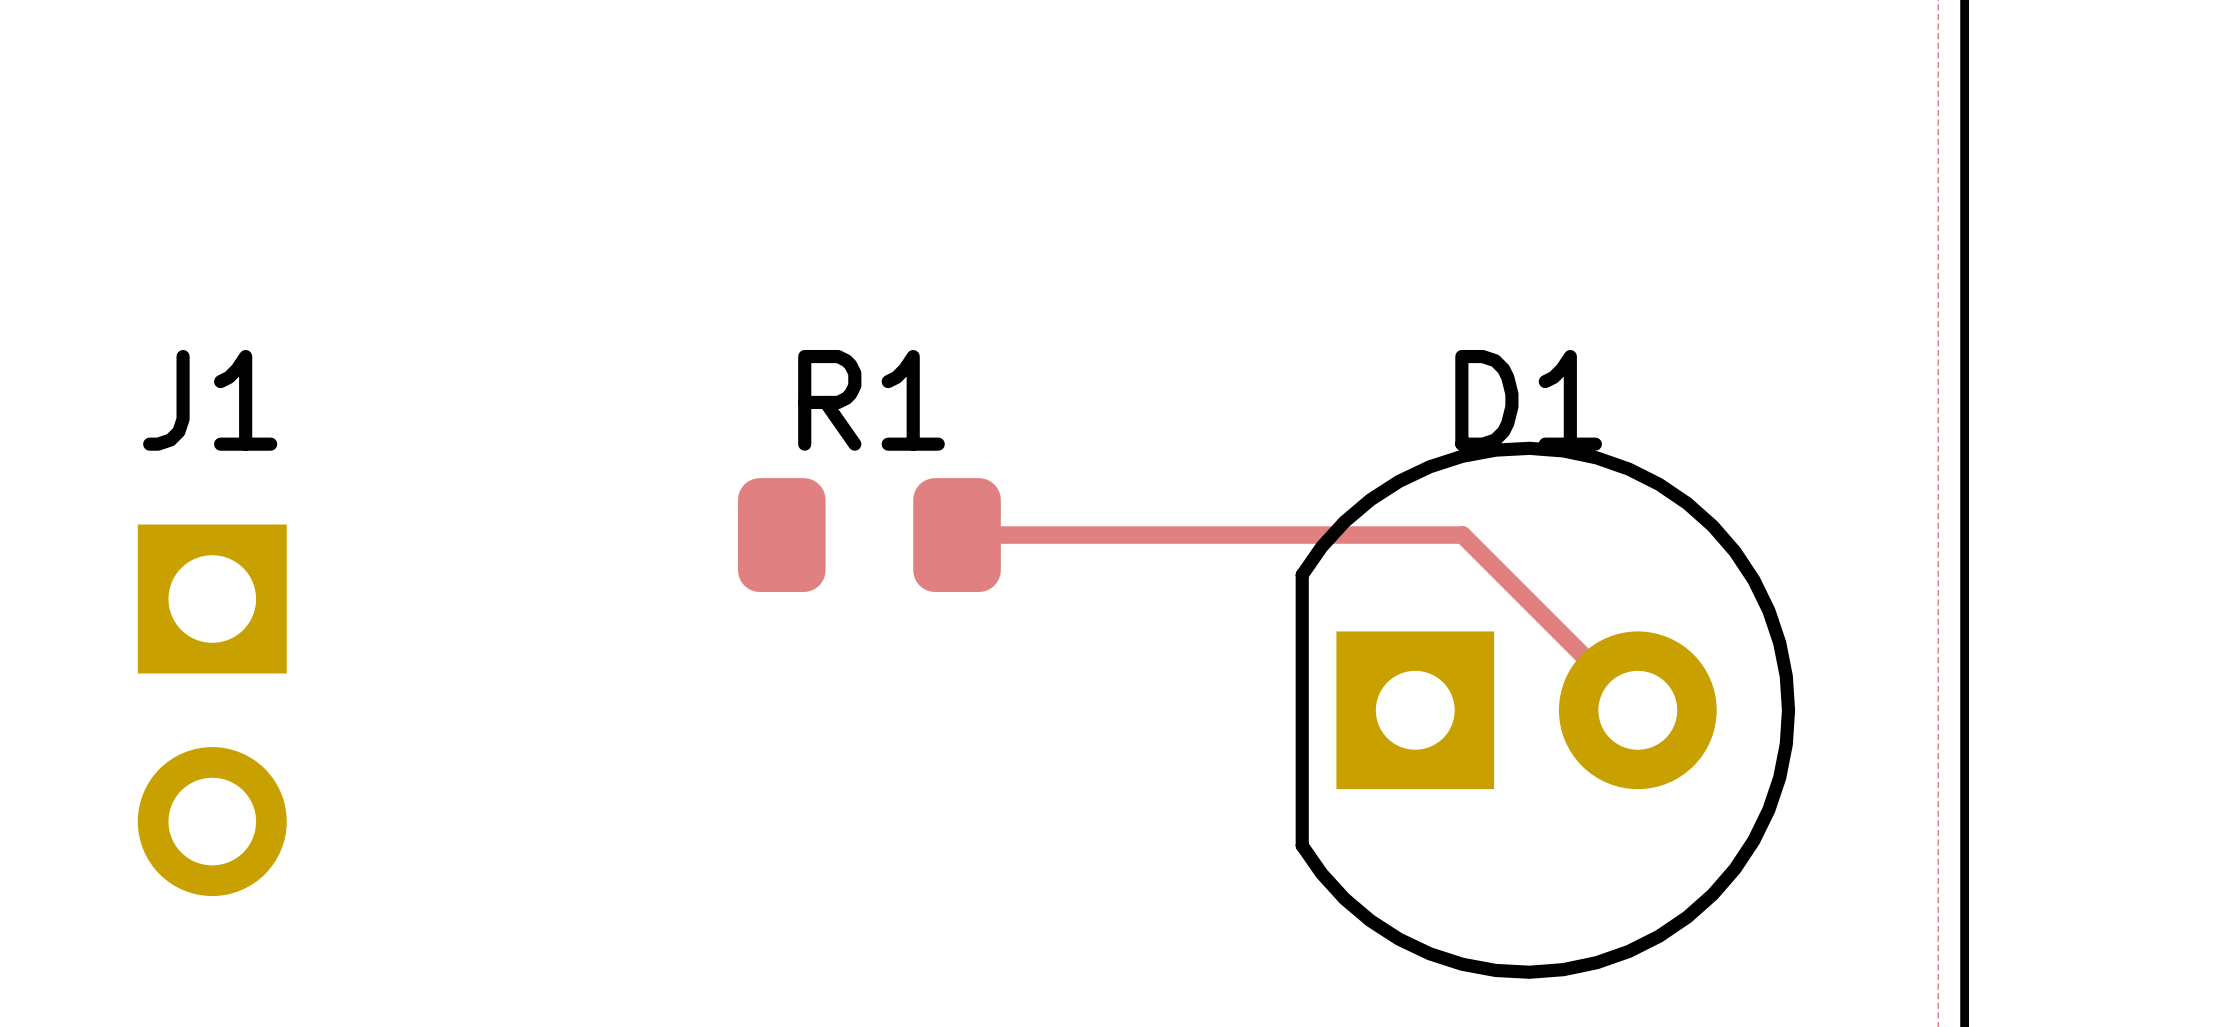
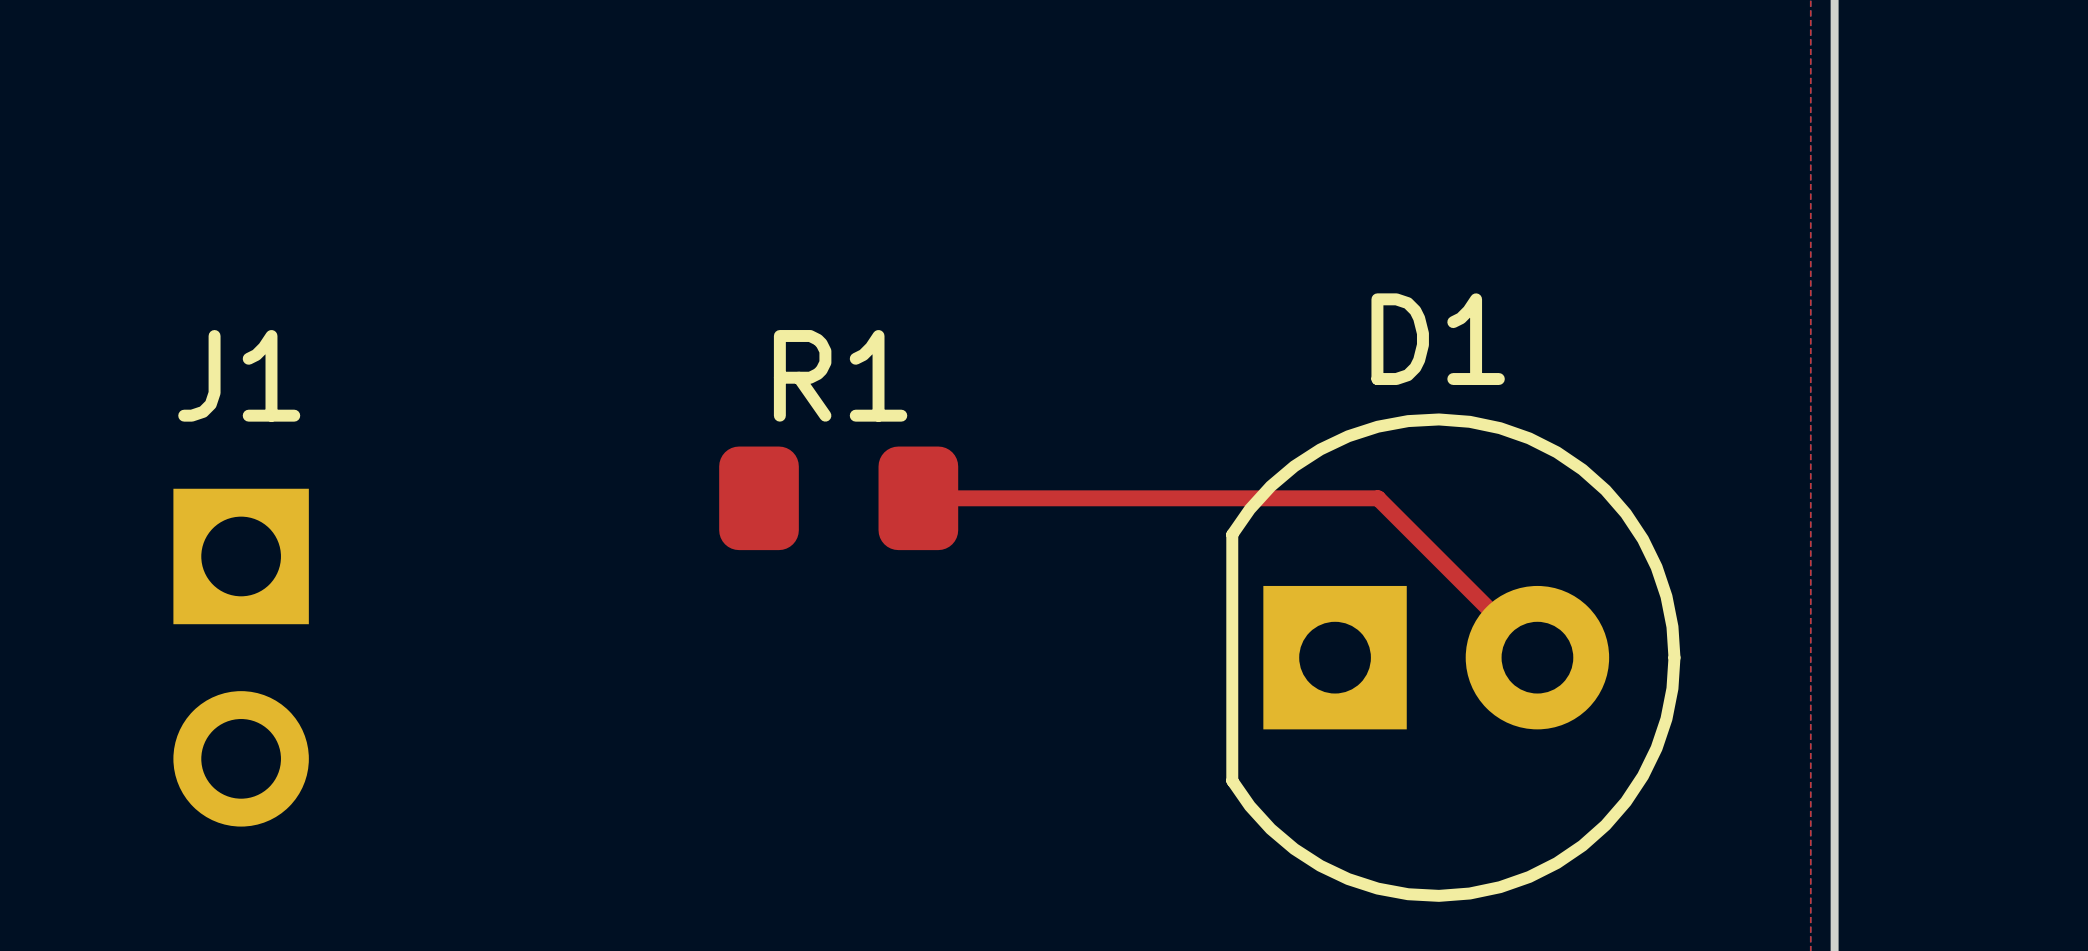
D1 name position: D1 (1528, 400) -> D1 (1438, 339)

